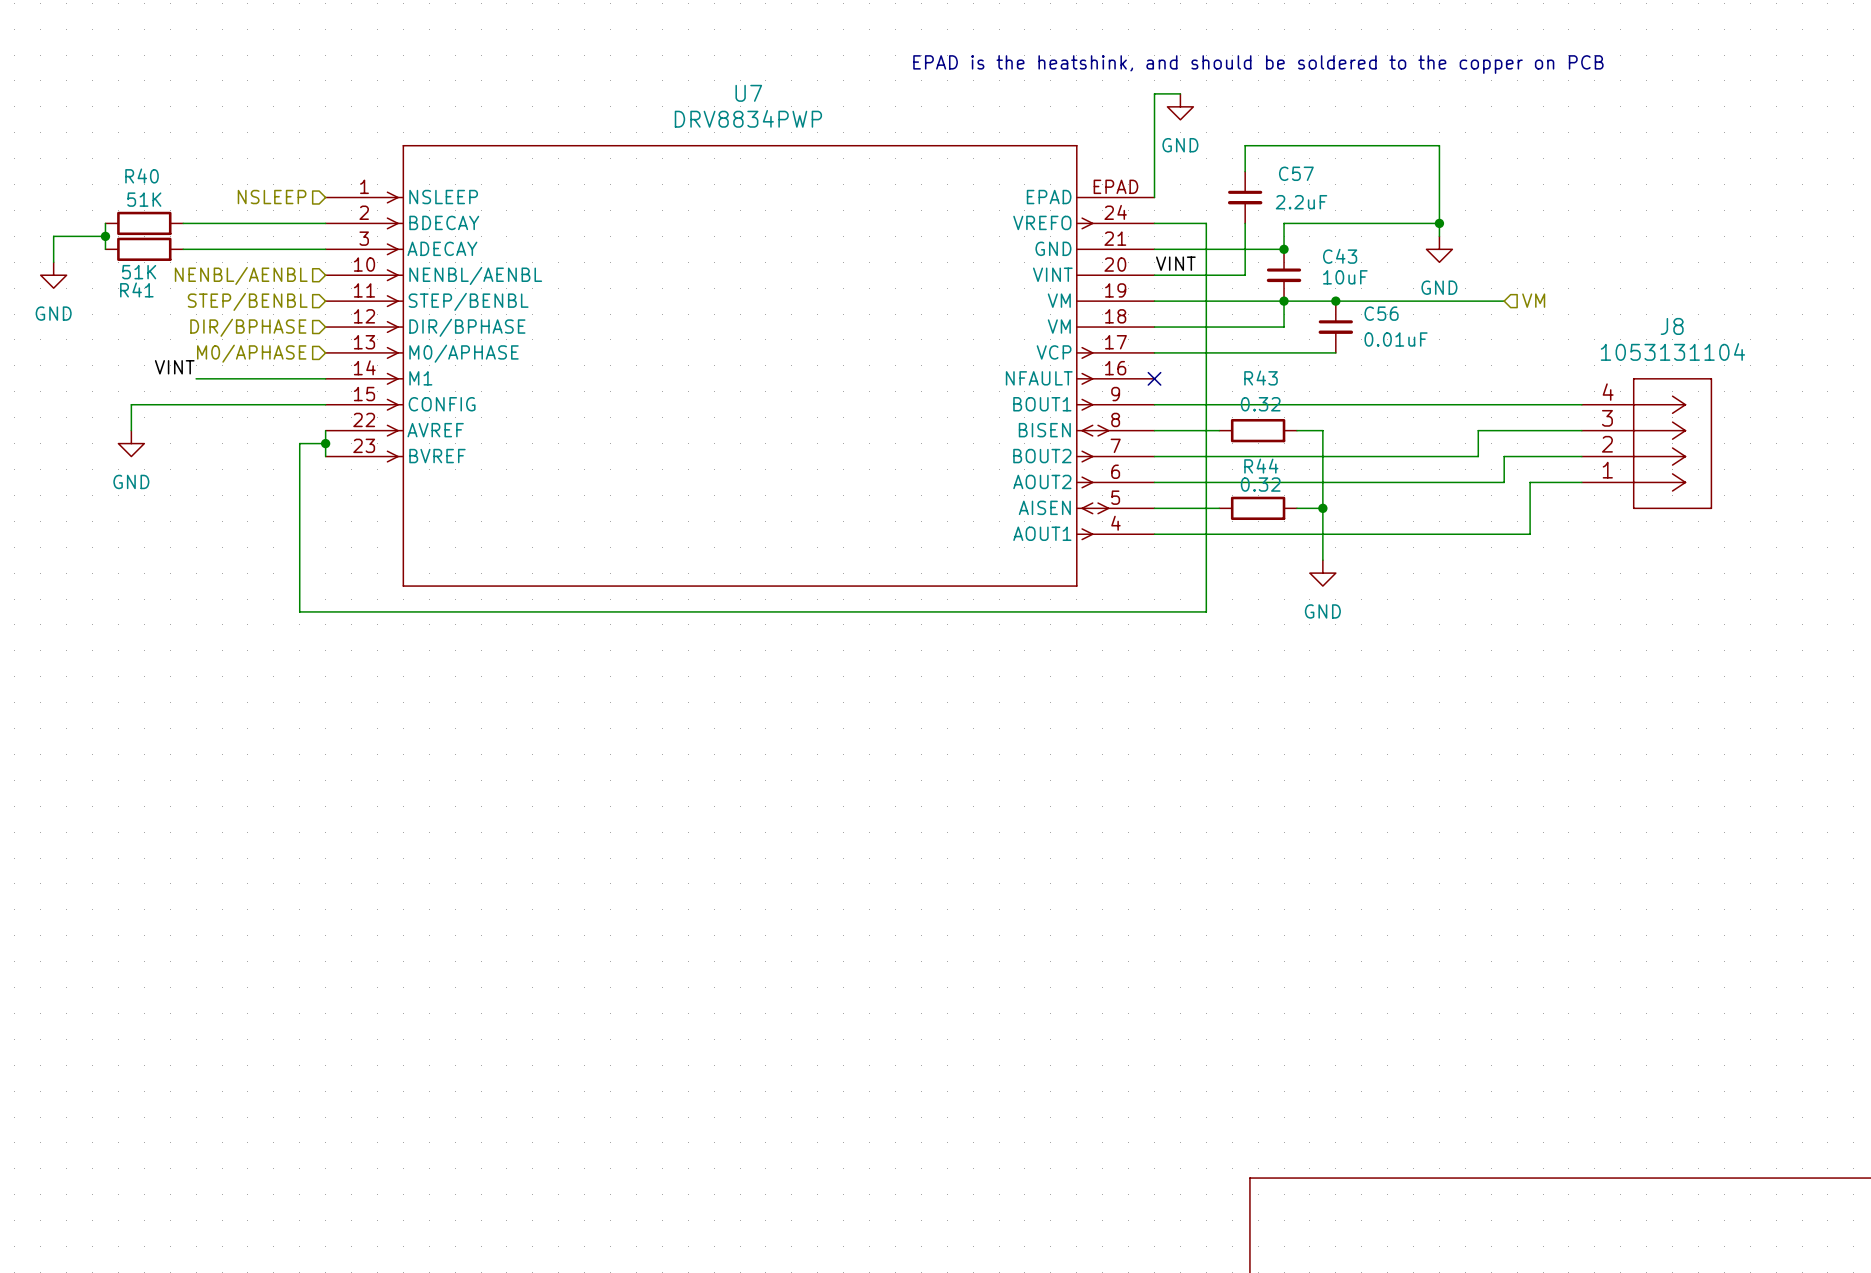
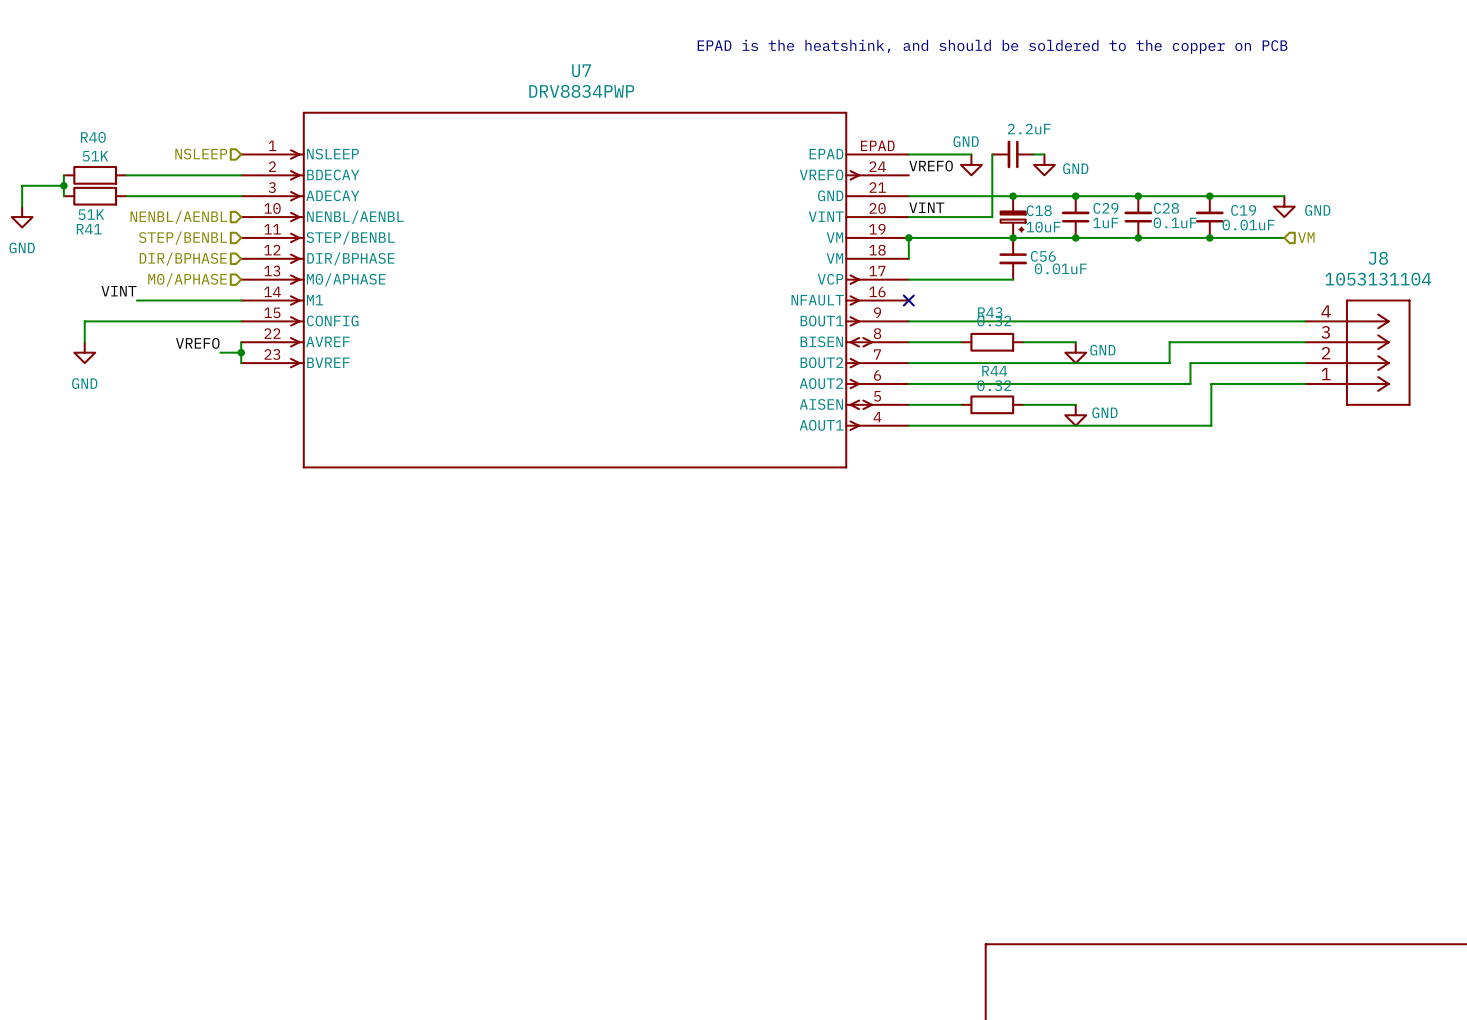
wire: (1180, 93) (1154, 93) (1154, 197) -> (971, 154) (908, 154)
power symbol: GND (1180, 106) -> none
wire: (1245, 171) (1245, 145) (1439, 145) (1439, 236) -> none
C57: 2.2uF (1245, 197) -> none
part: none -> 2.2uF (1013, 154)
wire: none -> (1034, 154) (1044, 154)
power symbol: none -> GND (971, 164)
power symbol: none -> GND (1044, 164)
label: none -> VREFO (931, 166)
wire: (1154, 223) (1206, 223) (1206, 611) (299, 611) (299, 443) -> none
wire: (1245, 223) (1245, 275) -> (992, 154) (992, 217) (981, 217)
wire: (1439, 223) (1284, 223) (1284, 249) -> (1284, 196) (1013, 196)
junction position: (1439, 223) -> (1138, 196)
junction: none -> (1075, 196)
power symbol: GND (1439, 249) -> none
junction: none -> (1209, 196)
power symbol: none -> GND (1284, 206)
C43: 10uF (1284, 275) -> none
C18: none -> 10uF (1013, 217)
C29: none -> 1uF (1075, 217)
C28: none -> 0.1uF (1138, 217)
C19: none -> 0.01uF (1209, 217)
hierarchical label position: VM (1533, 300) -> VM (1306, 237)
junction: none -> (908, 237)
wire: (1284, 301) (1284, 327) (1154, 327) -> (908, 237) (908, 258)
junction position: (1335, 301) -> (1075, 237)
junction: none -> (1138, 237)
wire: none -> (1190, 237) (1284, 237)
junction: none -> (1209, 237)
C56 name position: C56 (1381, 313) -> C56 (1043, 256)
C56 position: (1335, 327) -> (1013, 258)
wire: (1284, 352) (1335, 352) -> none
R43 name position: R43 (1261, 378) -> R43 (990, 312)
wire: (1322, 430) (1322, 560) -> (1044, 342) (1075, 342)
label: none -> VREFO (197, 343)
power symbol: none -> GND (1075, 352)
J8 position: (1646, 443) -> (1357, 352)
wire: none -> (1044, 404) (1075, 404)
junction: (1322, 508) -> none
power symbol position: GND (1322, 573) -> GND (1075, 415)
power symbol text position: GND (1322, 611) -> GND (1104, 412)

